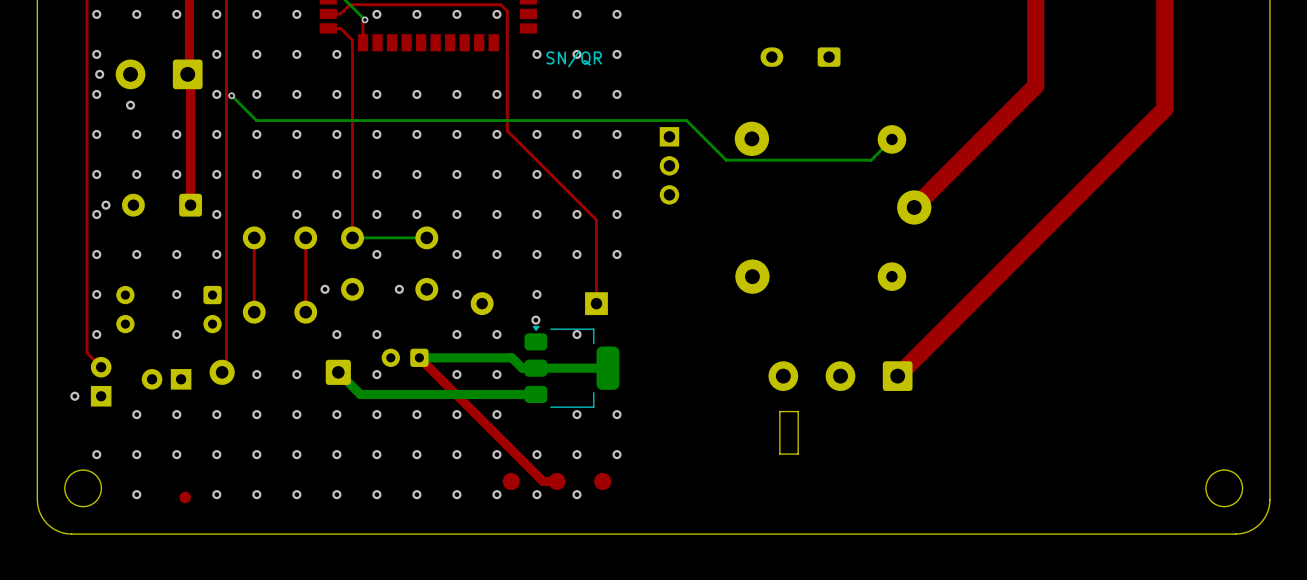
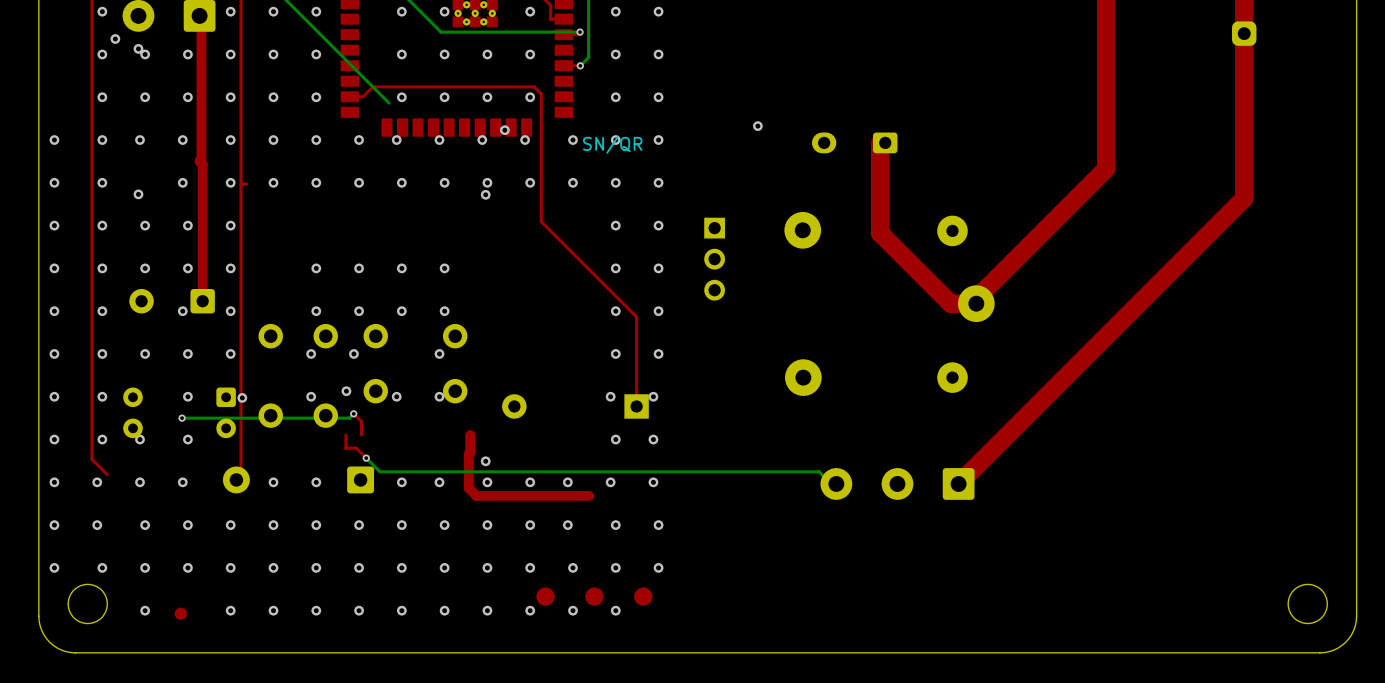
top track: (364, 19) (363, 21) (363, 42) -> none
via: (364, 19) -> none
top track: (328, 28) (340, 28) (352, 40) (352, 237) -> none
via: none -> (757, 126)
via: none -> (504, 130)
via: none -> (54, 140)
via: none -> (139, 140)
via: none -> (182, 140)
via: none -> (396, 140)
via: none -> (439, 140)
via: none -> (482, 140)
via: none -> (525, 140)
via: (99, 74) -> none
part: (159, 74) -> none
top track: (1035, 81) (1035, 85) (914, 207) -> (1106, 168) (971, 303) (950, 303) (880, 233) (880, 142)
via: none -> (54, 182)
via: none -> (182, 182)
bottom track: (231, 95) (256, 120) (686, 120) (726, 160) (871, 160) (891, 139) -> none
via: (231, 95) -> none
via: none -> (485, 194)
via: none -> (54, 225)
via: (256, 134) -> none
via: (296, 134) -> none
via: (336, 134) -> none
via: (376, 134) -> none
via: (416, 134) -> none
via: (456, 134) -> none
via: (496, 134) -> none
via: (536, 134) -> none
via: none -> (54, 268)
via: (256, 174) -> none
via: (456, 174) -> none
via: (496, 174) -> none
via: (536, 174) -> none
via: (105, 205) -> none
via: none -> (54, 311)
via: none -> (182, 311)
via: (456, 214) -> none
via: (496, 214) -> none
via: (536, 214) -> none
top track: (254, 237) (254, 312) -> none
top track: (305, 237) (305, 312) -> none
bottom track: (426, 237) (352, 237) -> none
via: none -> (54, 353)
via: none -> (311, 353)
via: none -> (353, 353)
via: (376, 254) -> none
via: none -> (439, 353)
via: (456, 254) -> none
via: (496, 254) -> none
via: (536, 254) -> none
via: (399, 289) -> none
via: none -> (54, 396)
via: none -> (311, 396)
via: none -> (396, 396)
via: none -> (439, 396)
via: (456, 294) -> none
via: (536, 294) -> none
via: none -> (610, 396)
via: none -> (653, 396)
via: none -> (242, 397)
top track: none -> (353, 413) (361, 421) (361, 435)
bottom track: none -> (353, 413) (349, 418) (182, 418)
via: none -> (353, 413)
via: none -> (182, 418)
via: (535, 320) -> none
top track: none -> (345, 435) (345, 448) (356, 448) (366, 458)
top track: none -> (470, 435) (468, 488) (476, 495) (589, 495)
via: none -> (54, 439)
via: none -> (139, 439)
via: (336, 334) -> none
via: (376, 334) -> none
via position: (456, 334) -> (485, 461)
via: (496, 334) -> none
via: none -> (653, 439)
bottom track: none -> (366, 458) (379, 471) (819, 471) (831, 483)
via: none -> (366, 458)
part: (405, 357) -> none
top track: (419, 357) (543, 481) (556, 481) -> none
bottom track: (419, 357) (511, 357) (522, 368) (607, 368) -> none
part: (571, 366) -> none
bottom track: (338, 372) (360, 394) (535, 394) -> none
via: none -> (54, 482)
via: none -> (97, 482)
via: none -> (139, 482)
via: none -> (182, 482)
via: none -> (439, 482)
via: none -> (567, 482)
via: none -> (610, 482)
via: none -> (653, 482)
part: (166, 379) -> none
part: (101, 381) -> none
via: (74, 396) -> none
board edge: (798, 411) (779, 411) (779, 454) (798, 454) (798, 411) -> none
via: none -> (54, 525)
via: none -> (97, 525)
via: none -> (567, 525)
via: none -> (54, 567)
part position: (185, 497) -> (180, 613)

